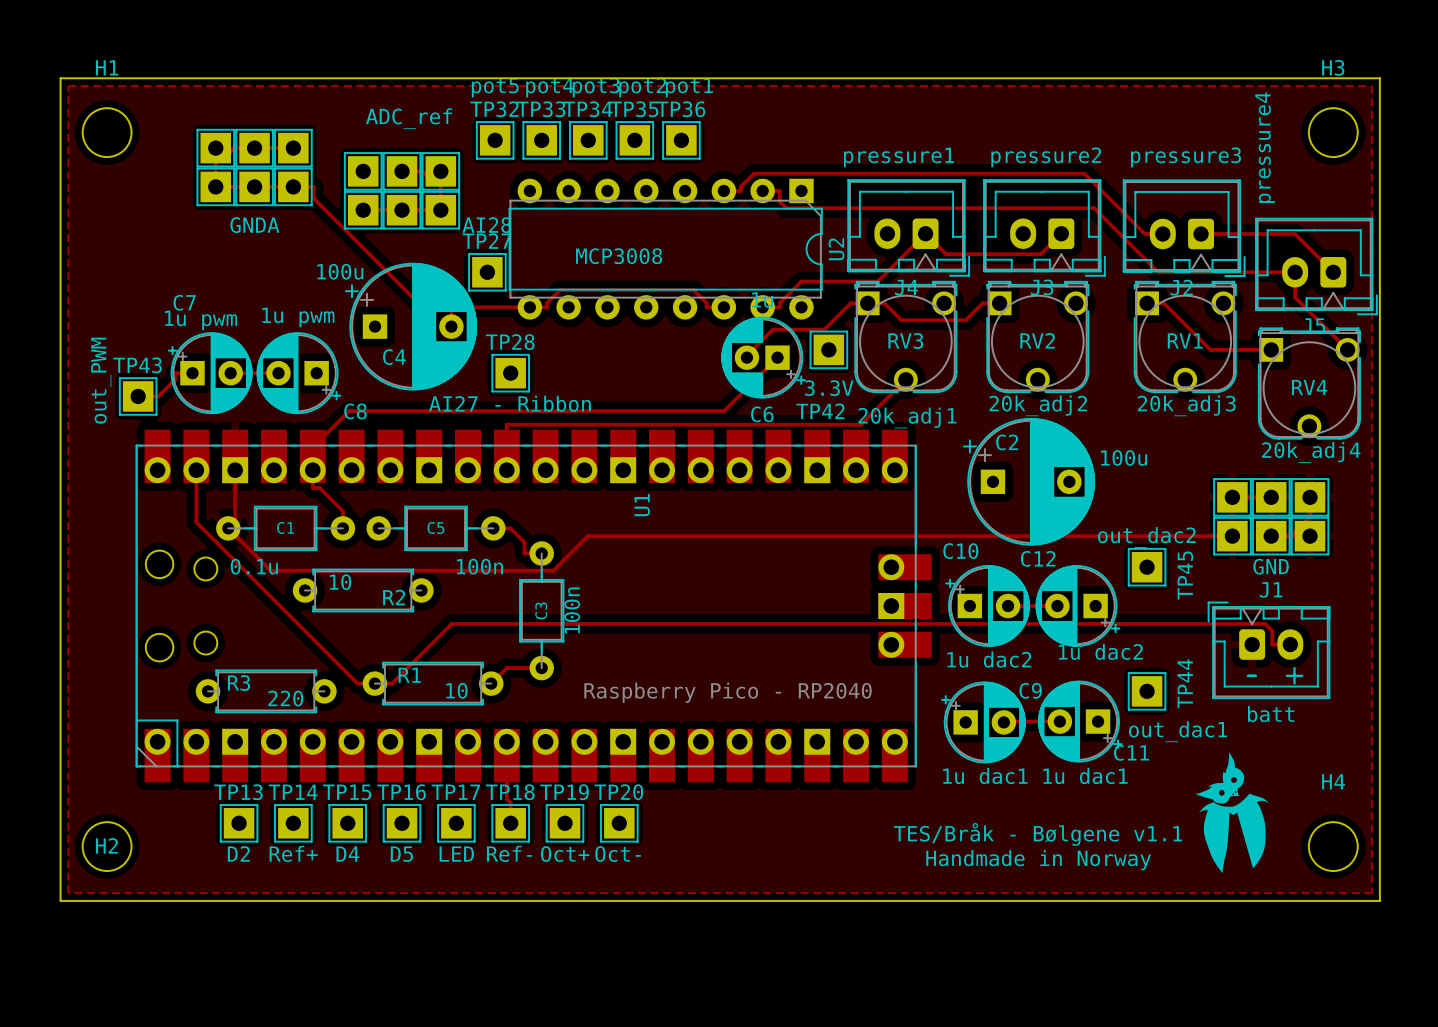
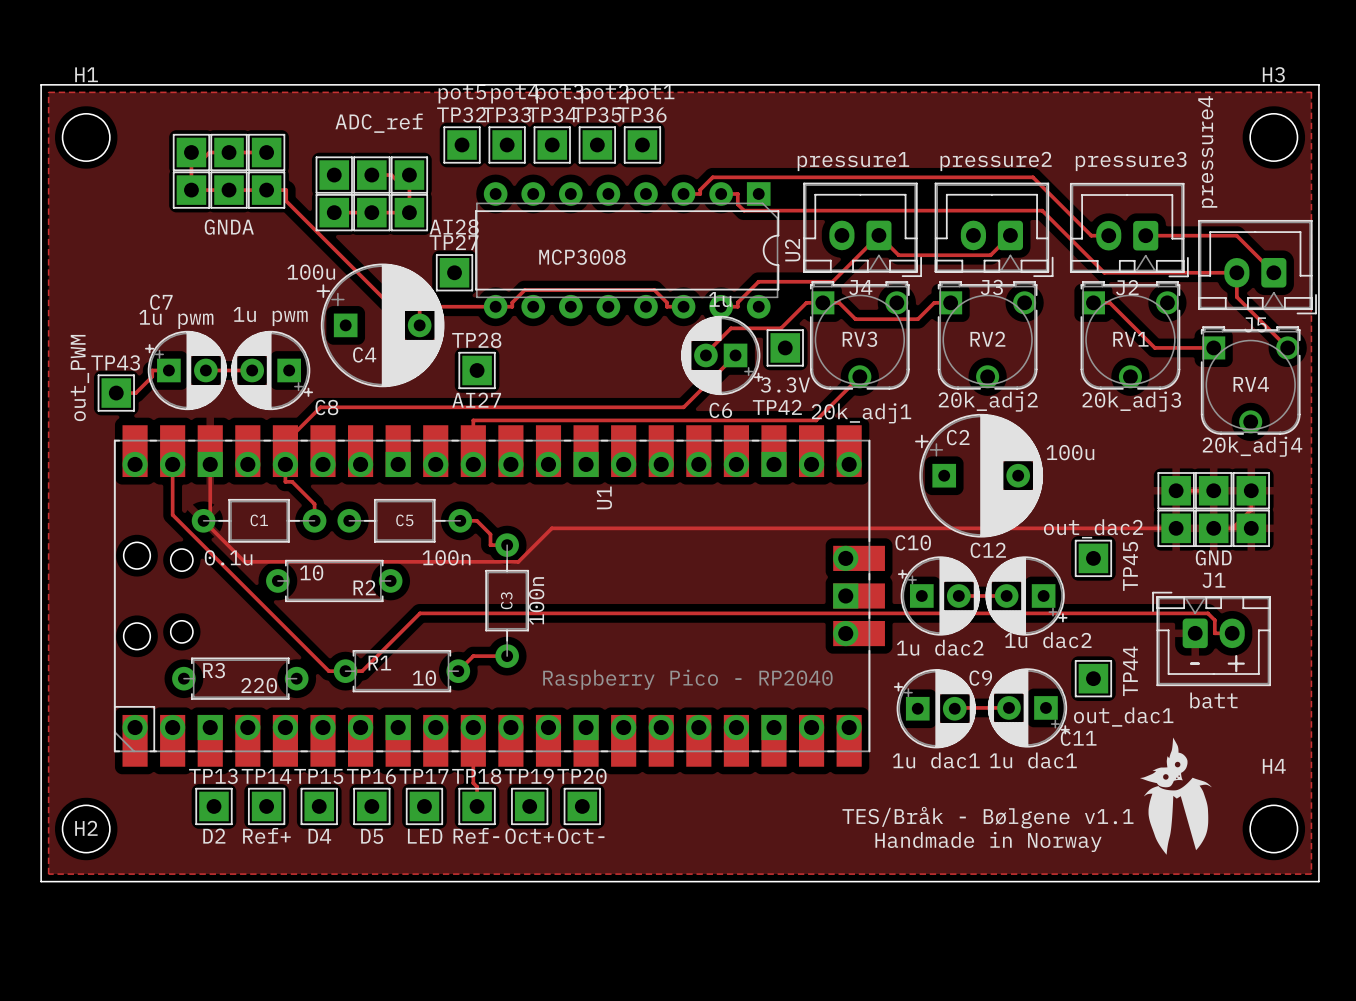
TP28 value: AI27 - Ribbon (509, 403) -> AI27 (476, 400)

